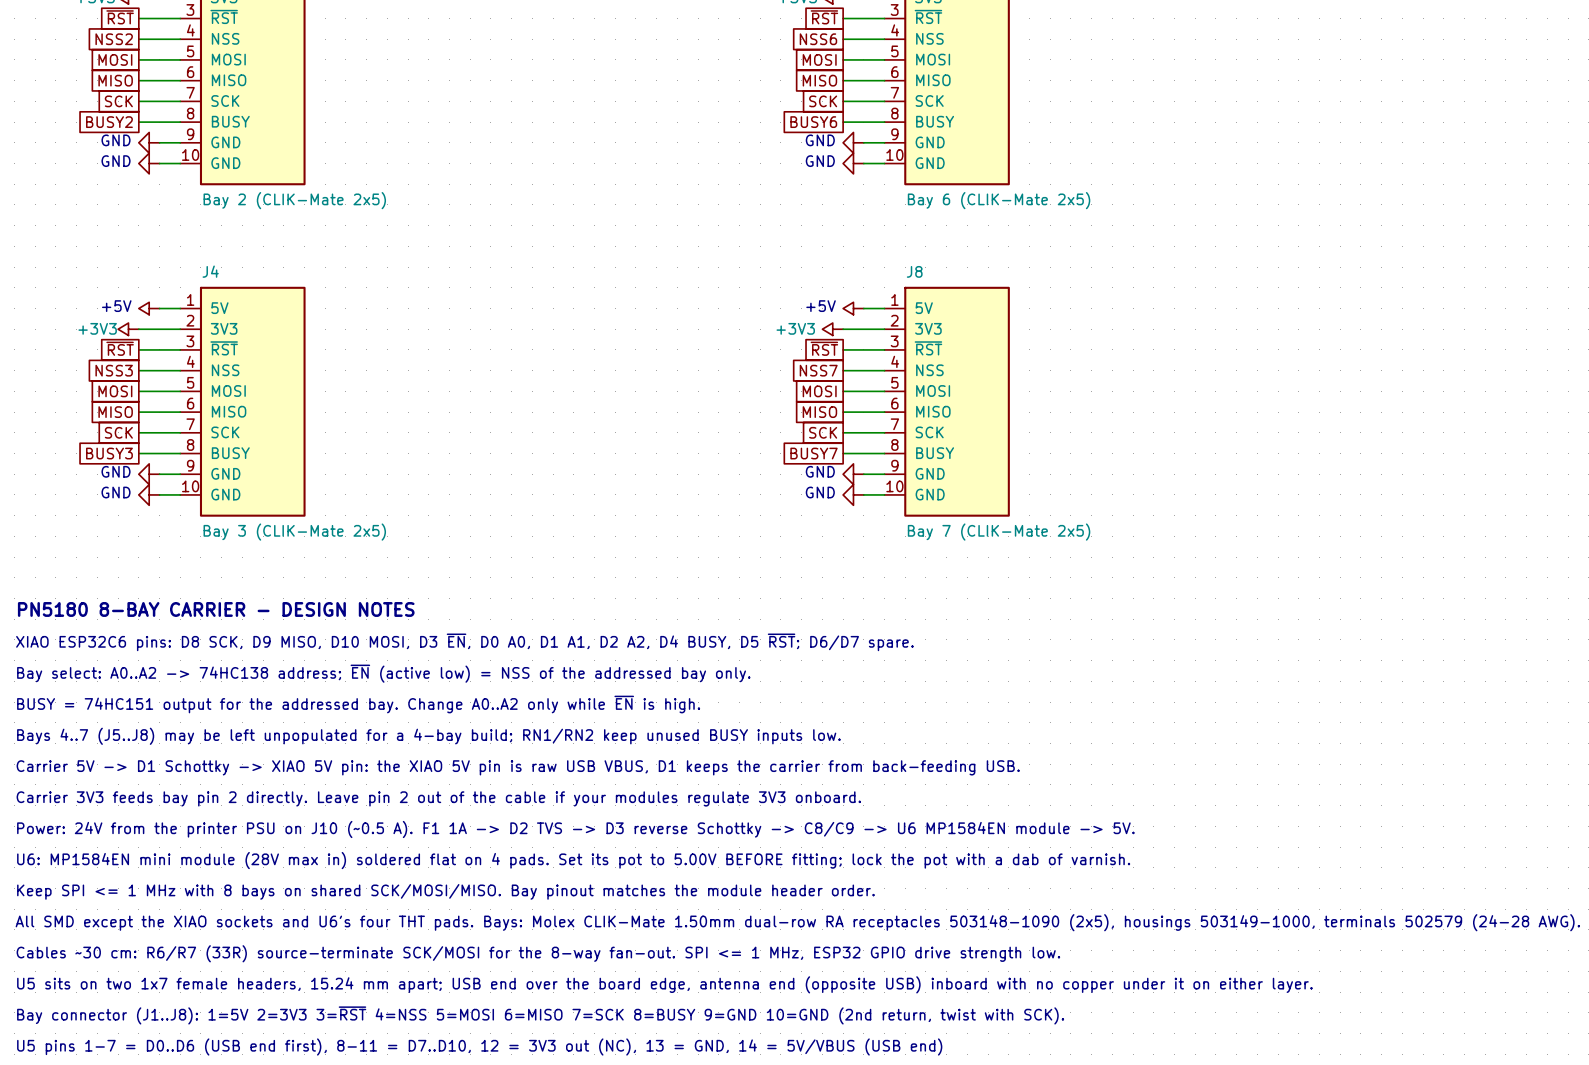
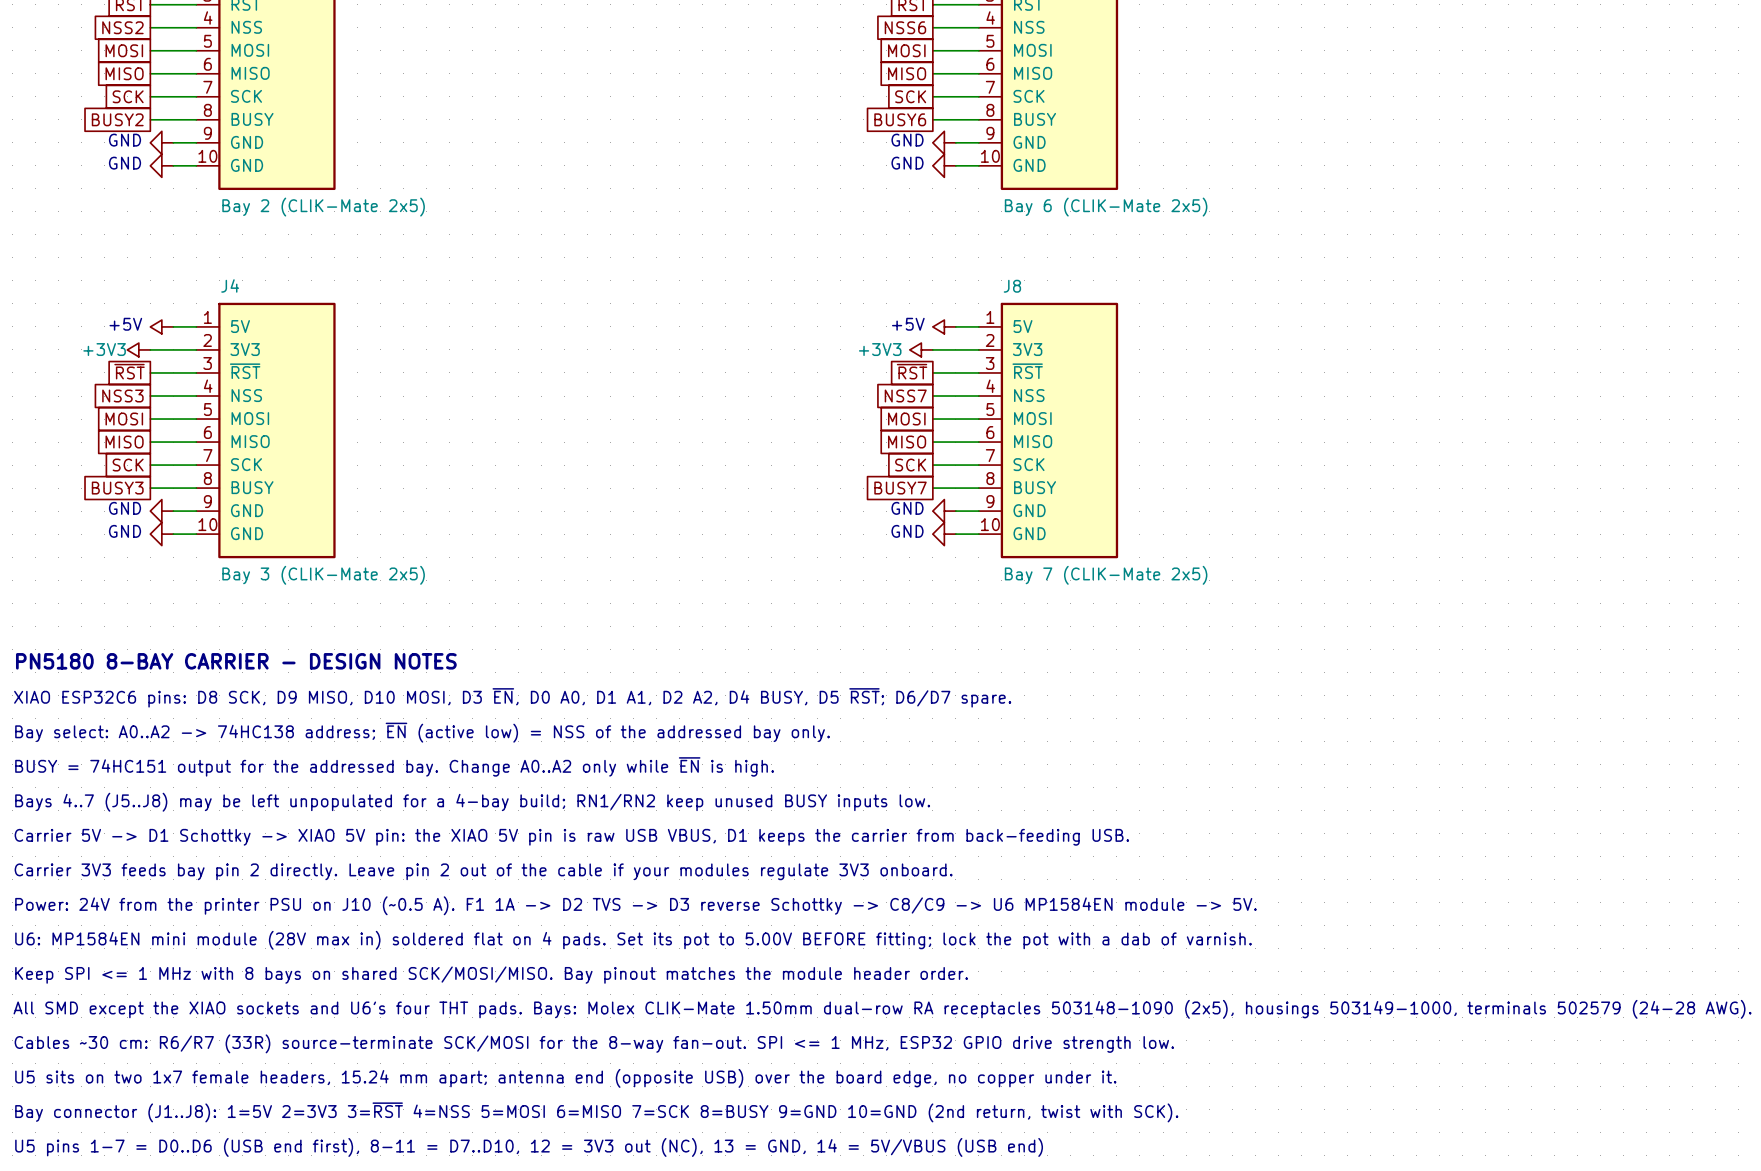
text: U5 sits on two 1x7 female headers, 15.24 mm apart; USB end over the board edge, antenna end (opposite USB) inboard with no copper under it on either layer. (664, 984) -> U5 sits on two 1x7 female headers, 15.24 mm apart; antenna end (opposite USB) over the board edge, no copper under it. (565, 1078)

